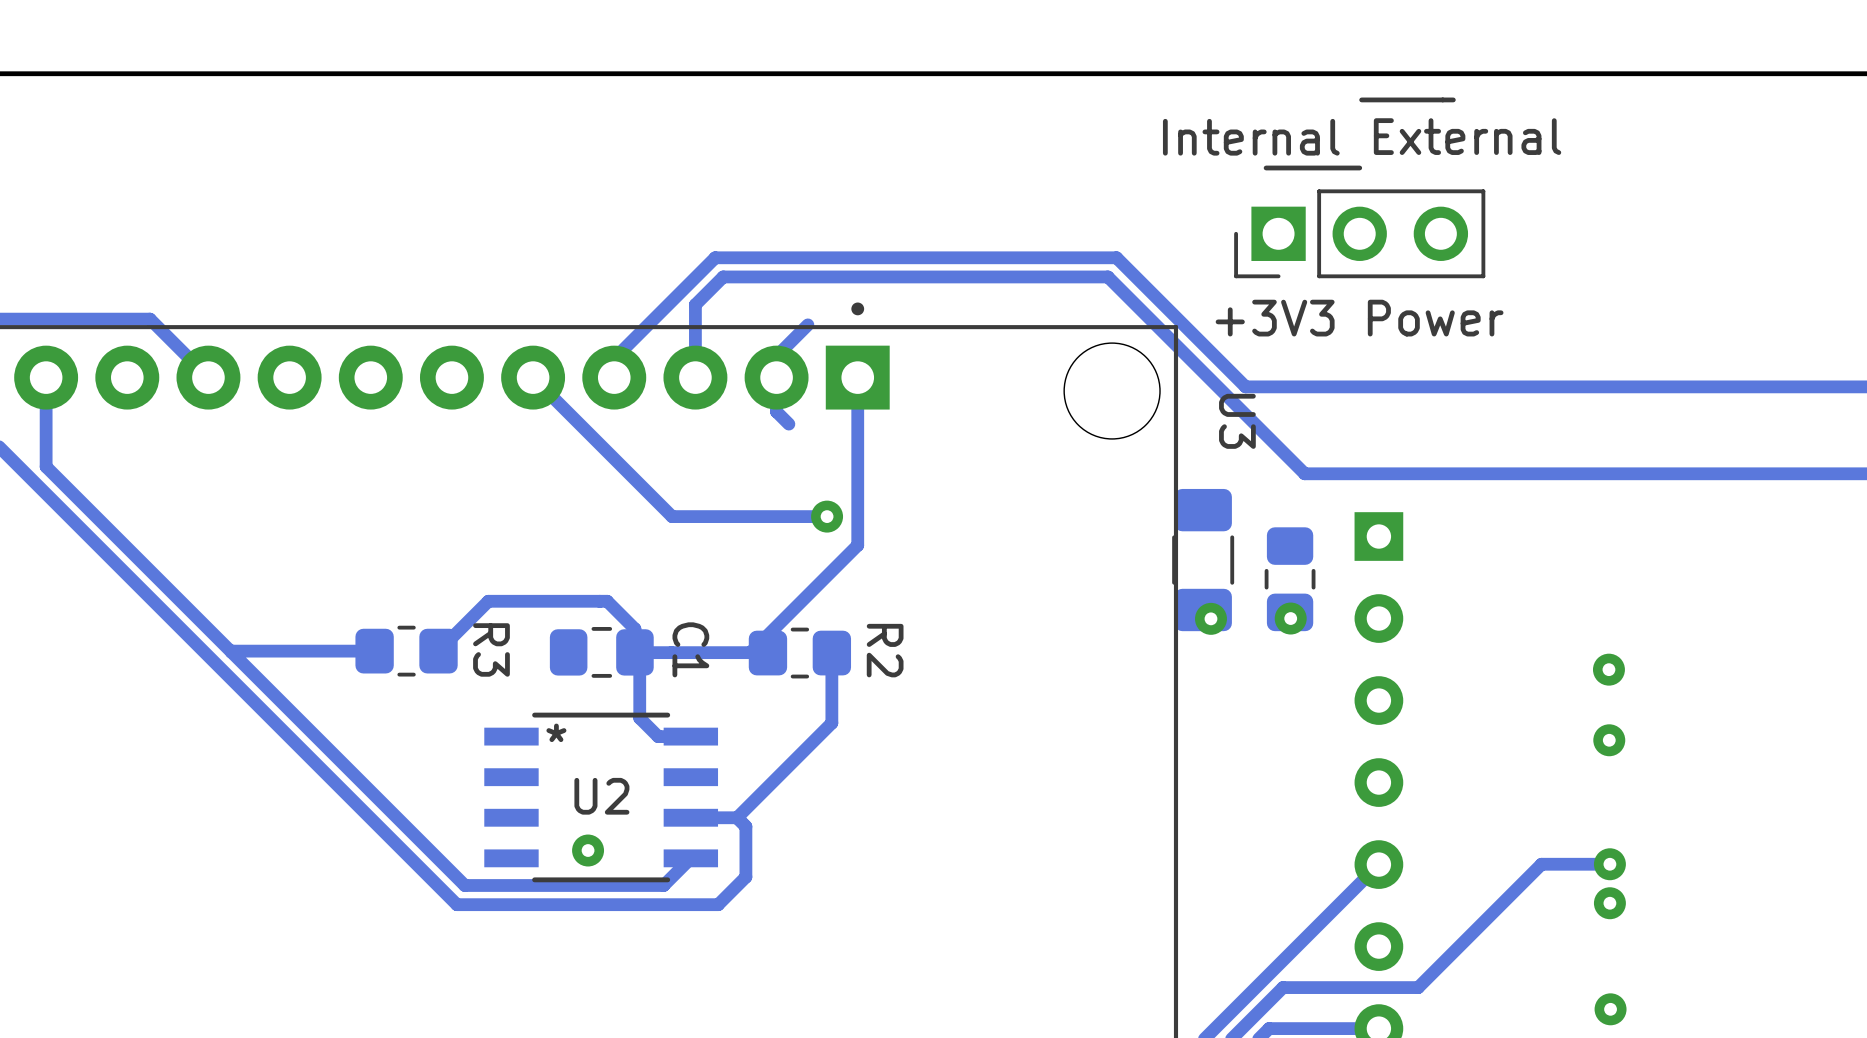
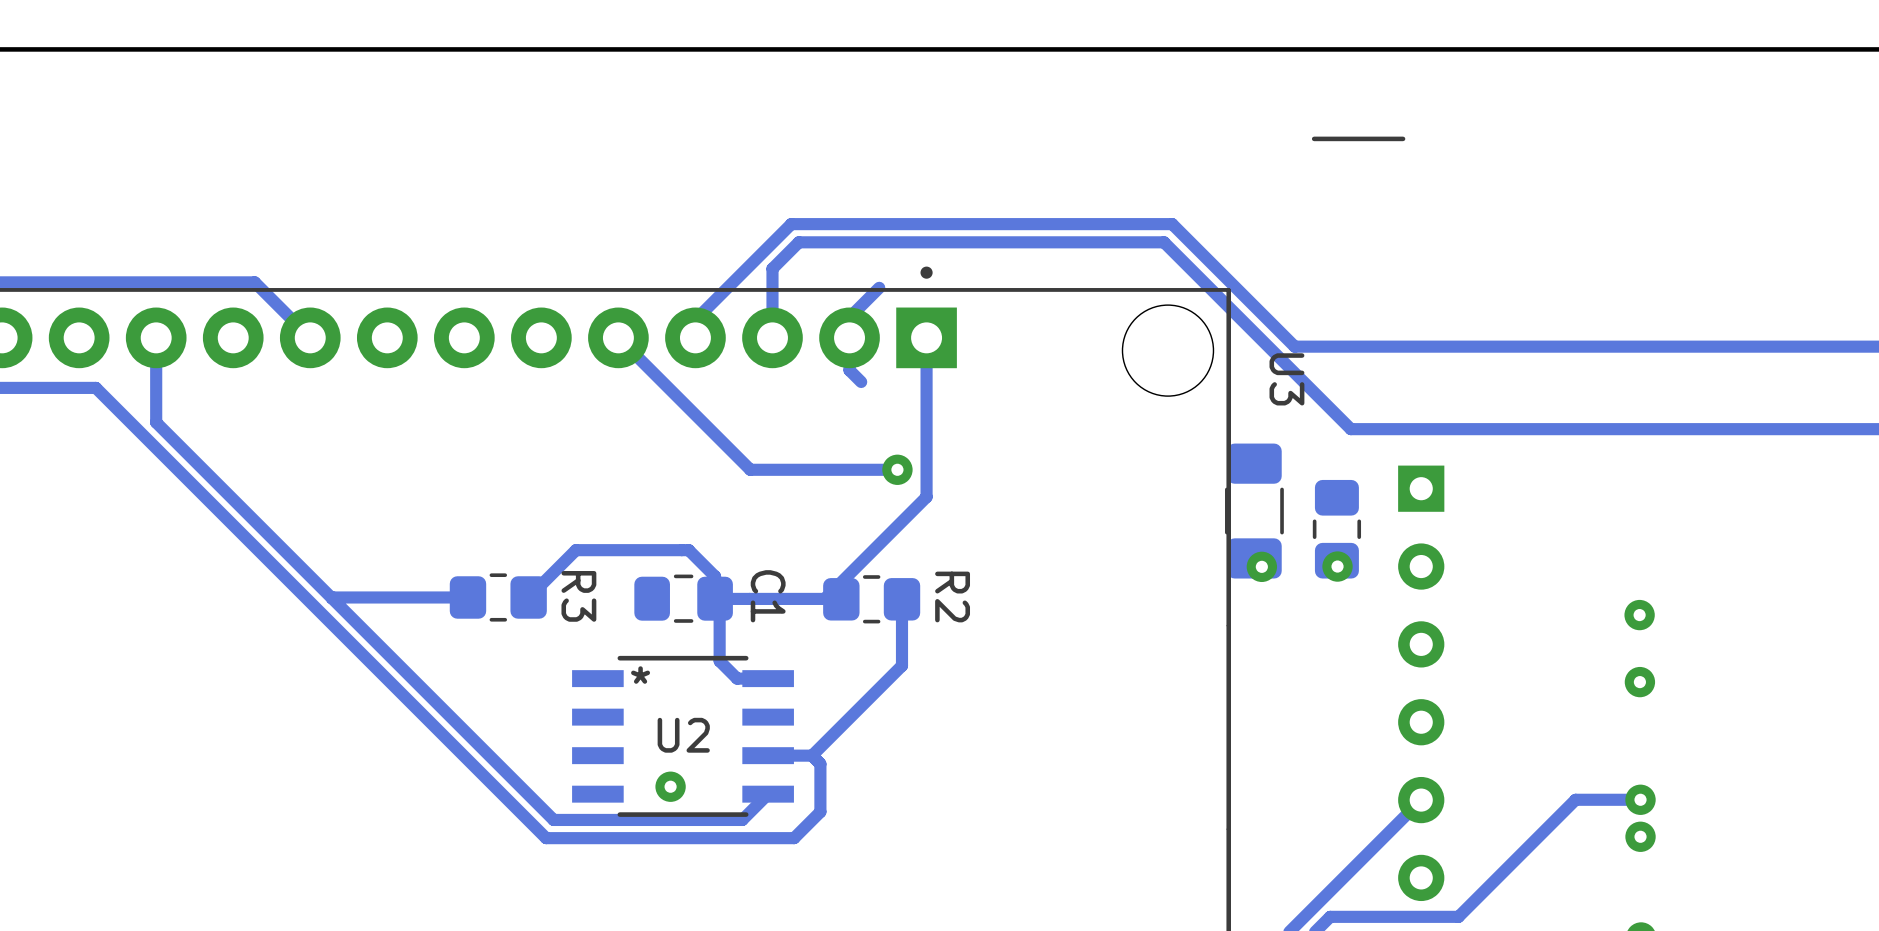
line: (1453, 99) (1361, 99) -> none
text: External (1467, 136) -> none
text: Internal (1251, 137) -> none
part: (1359, 233) -> none
text: +3V3 Power (1359, 318) -> none

